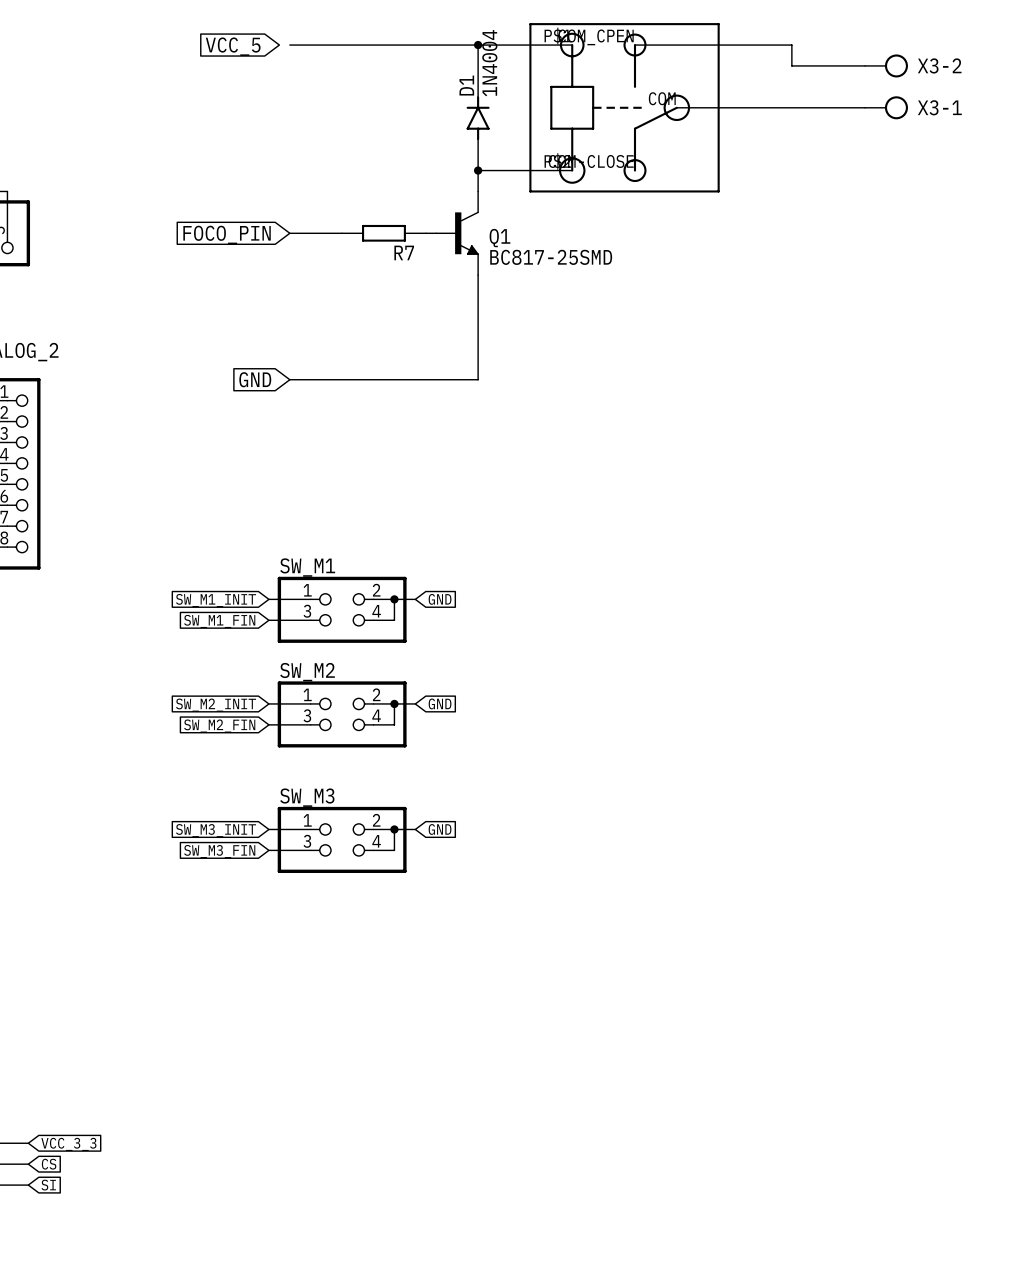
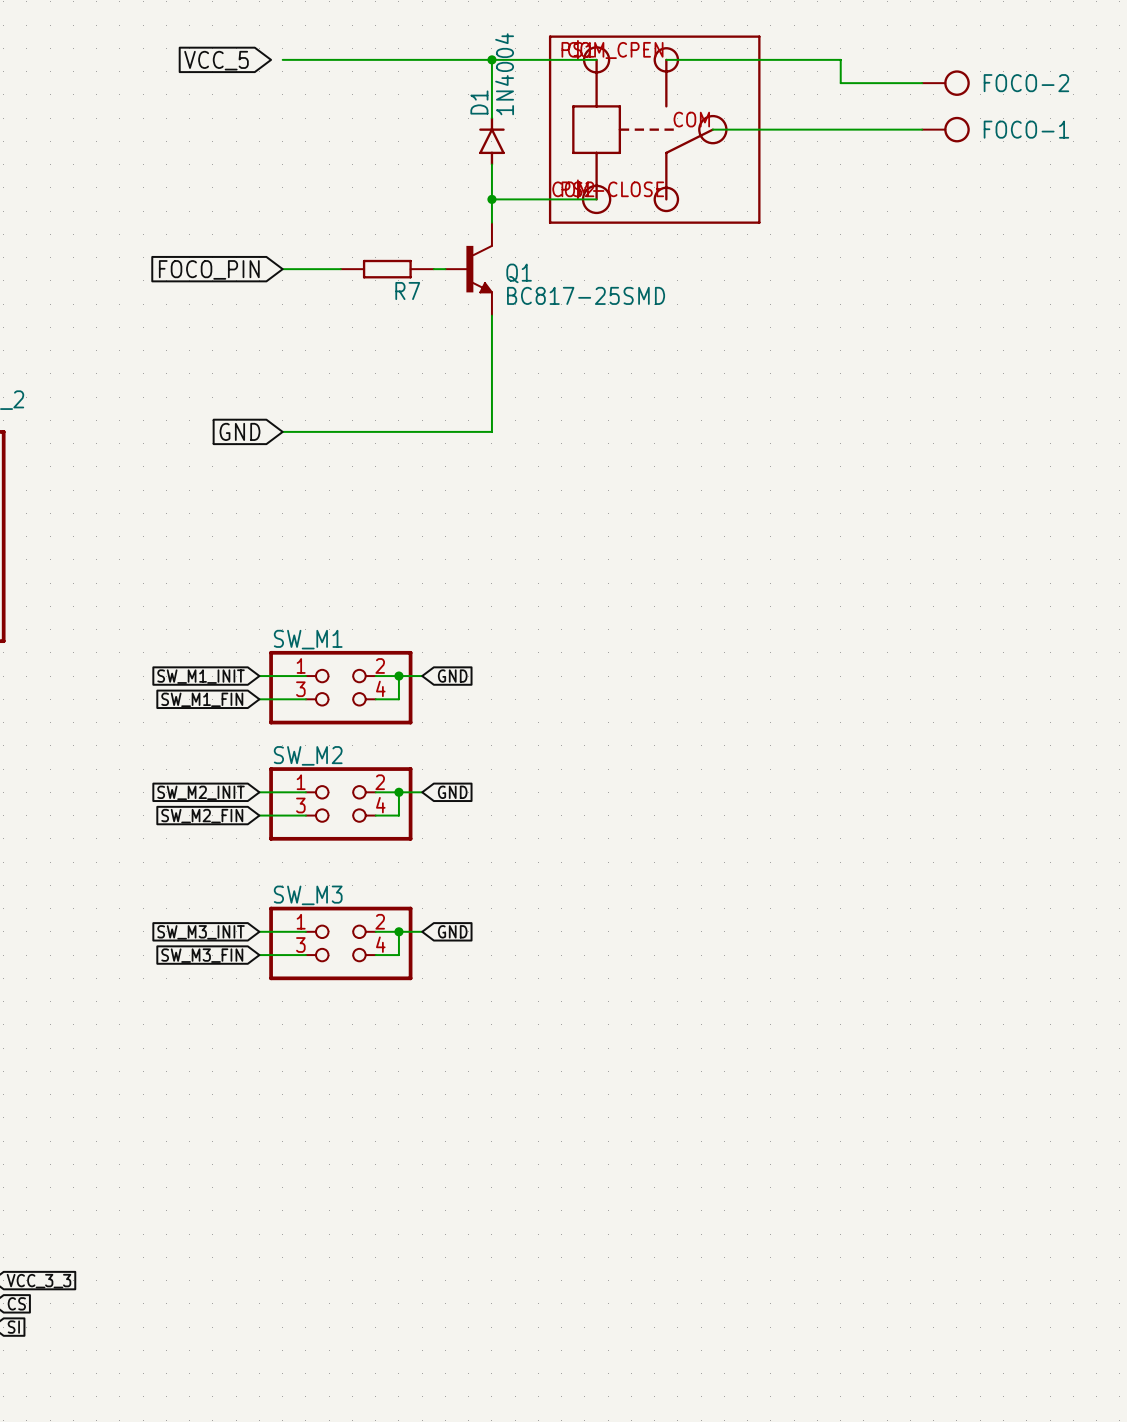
X3-2 name: X3-2 (939, 65) -> FOCO-2 (1026, 83)
X3-1 name: X3-1 (939, 107) -> FOCO-1 (1026, 129)

